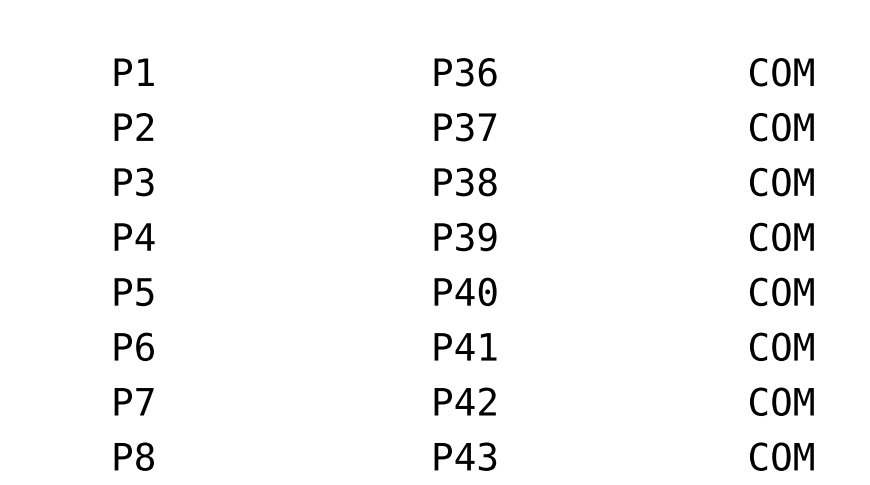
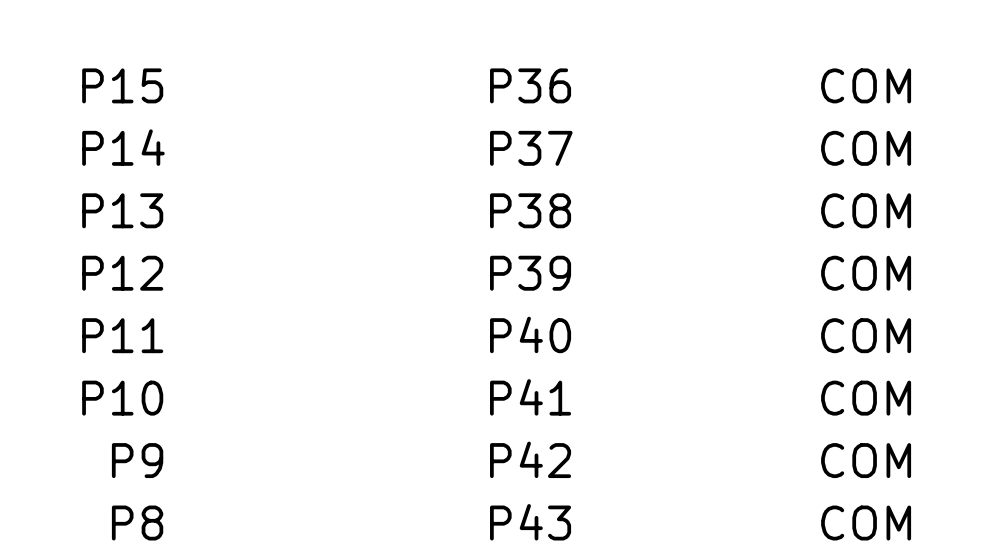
label: P1 (134, 72) -> P15 (122, 85)
label: P2 (133, 126) -> P14 (123, 147)
label: P3 (134, 182) -> P13 (122, 210)
label: P4 (134, 237) -> P12 (122, 273)
label: P5 (134, 292) -> P11 (122, 335)
label: P6 (134, 346) -> P10 (122, 398)
label: P7 (134, 401) -> P9 (137, 460)

